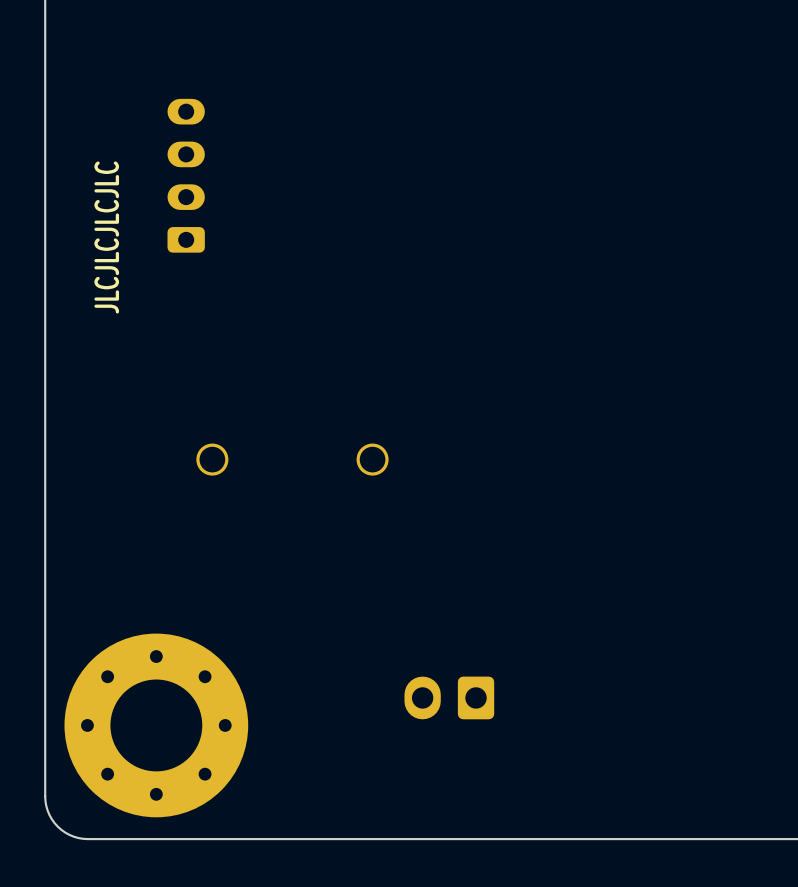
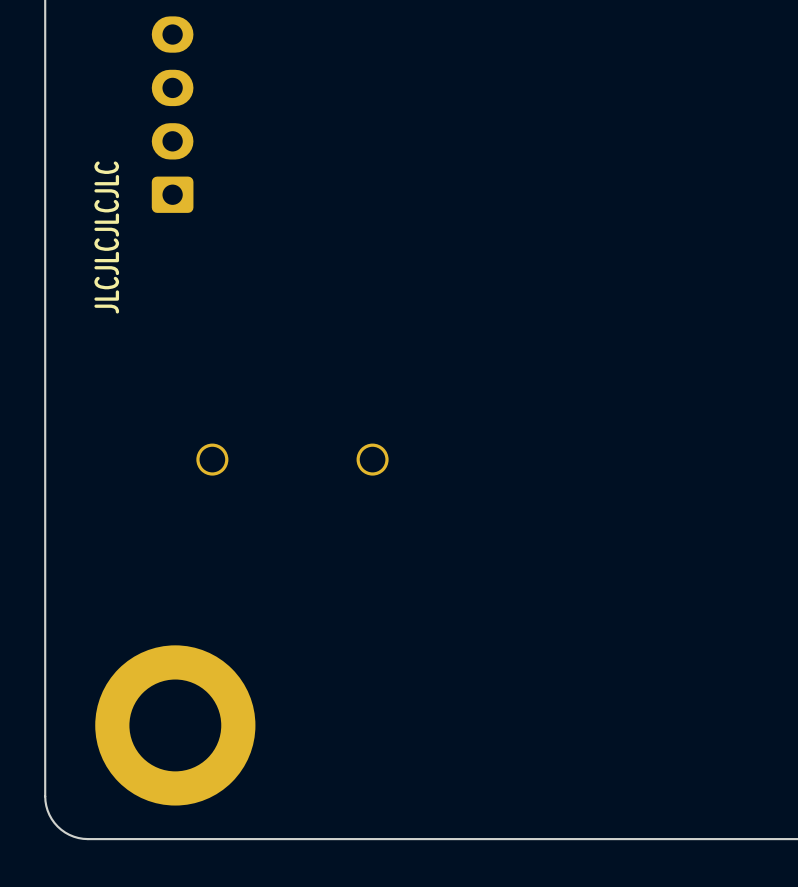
part: none -> (172, 114)
part: (186, 175) -> none
part footprint: [64, 633, 249, 818] -> [95, 645, 256, 806]
part: (449, 697) -> none

